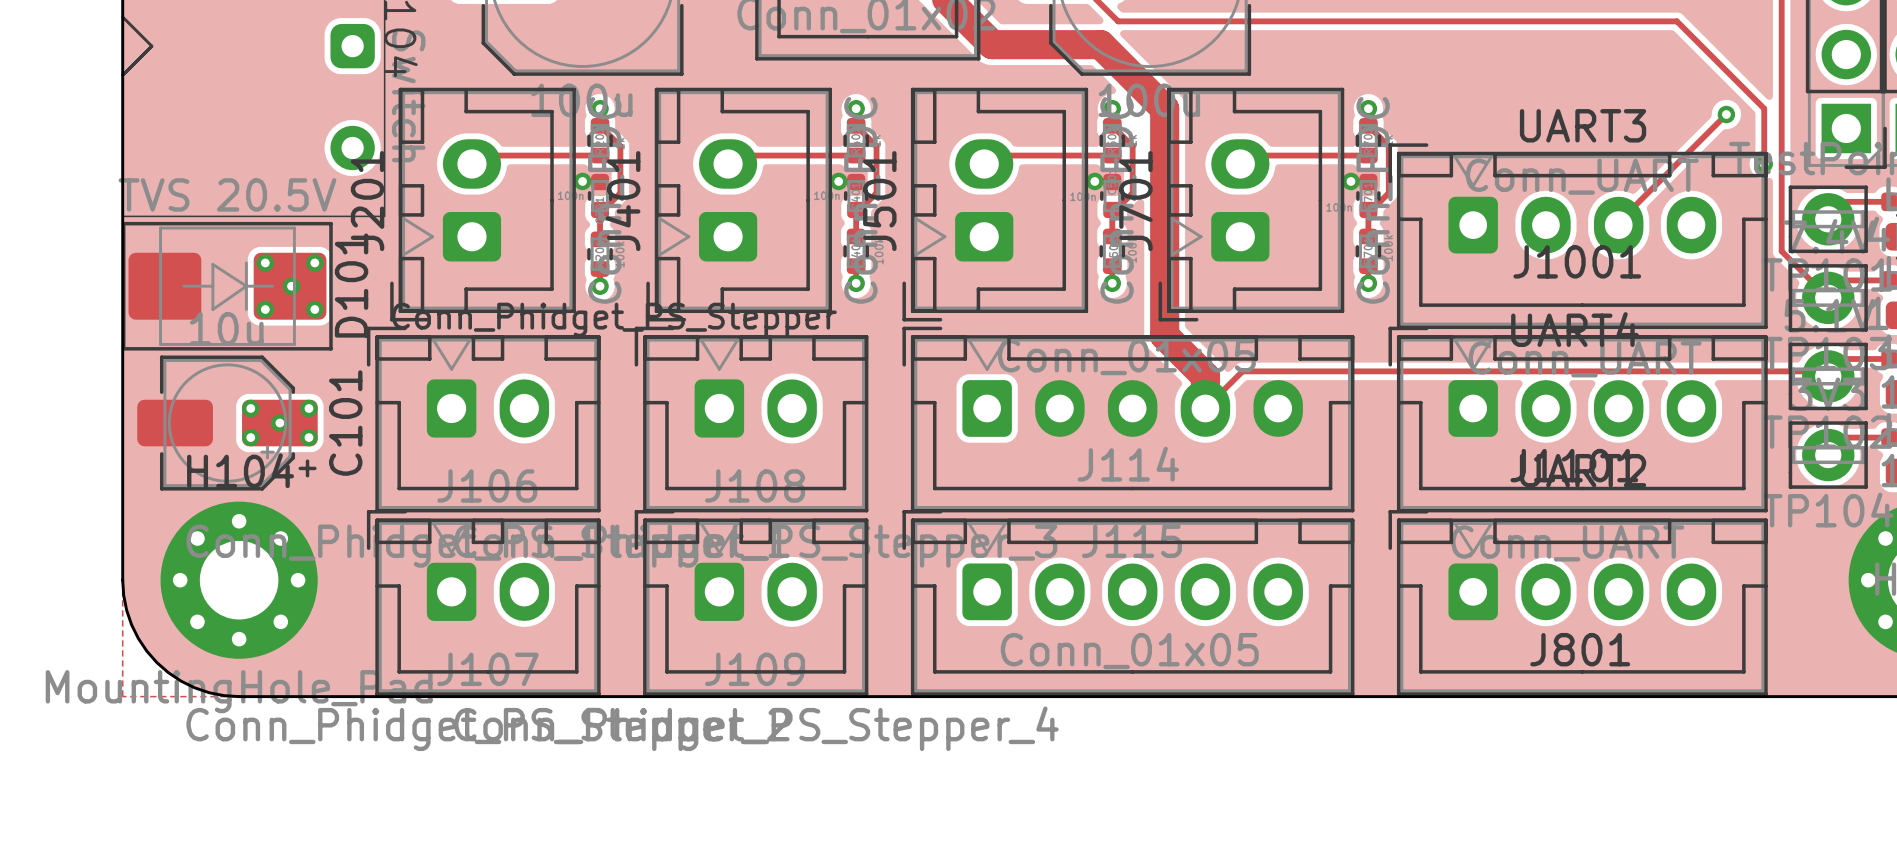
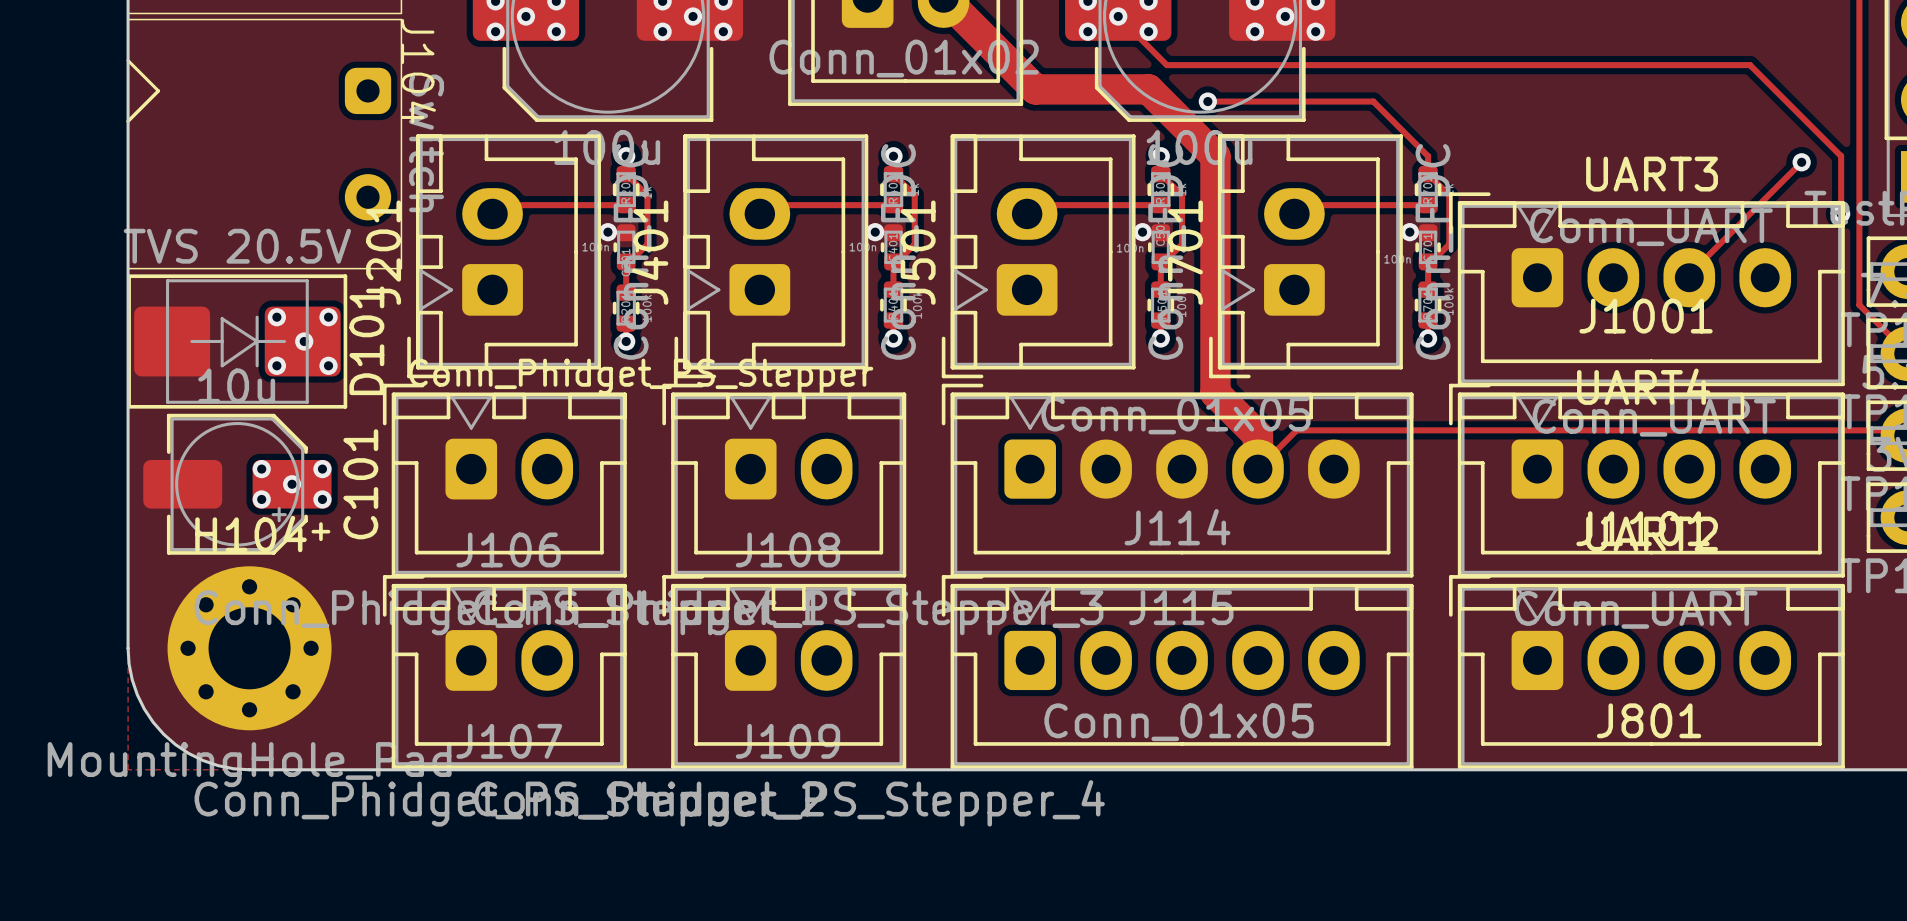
track: none -> (1207, 101) (1373, 101) (1428, 156)
via: none -> (1207, 101)
via: (1368, 108) -> none

